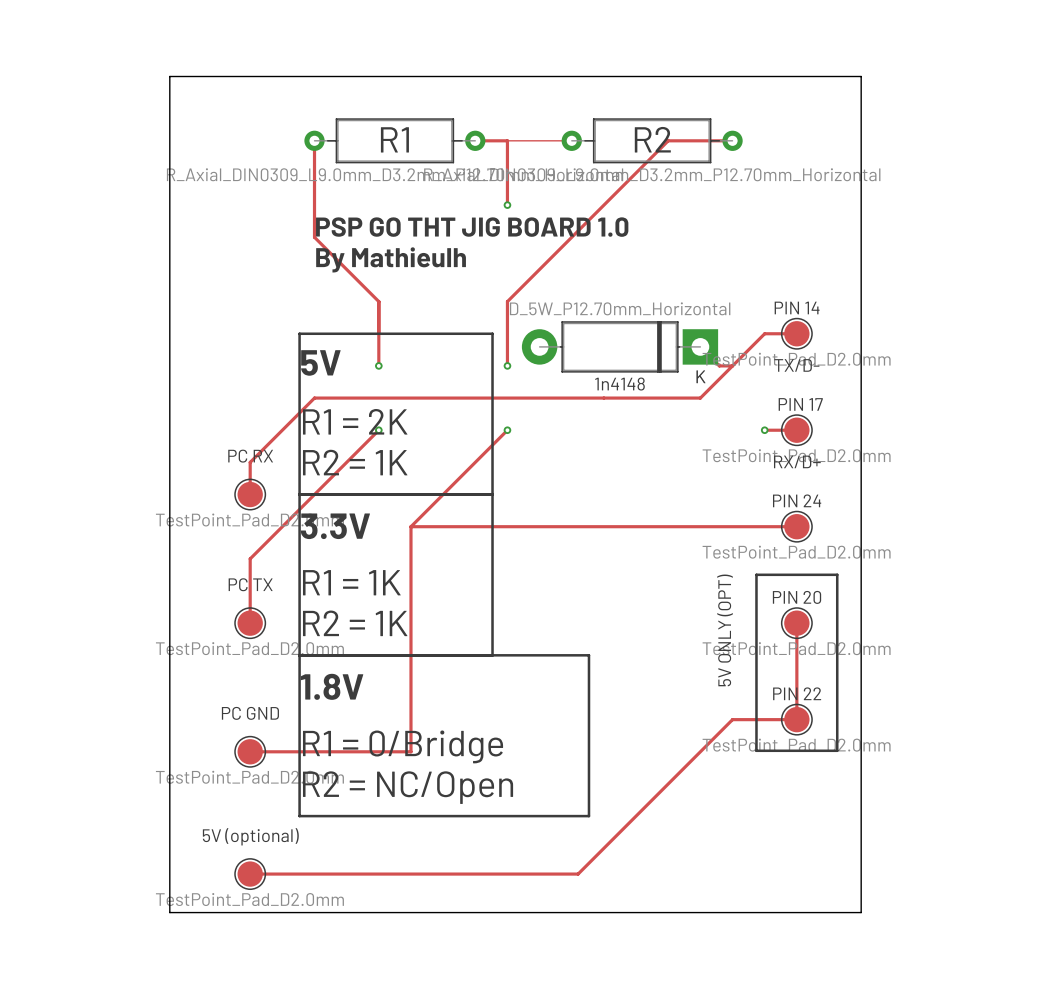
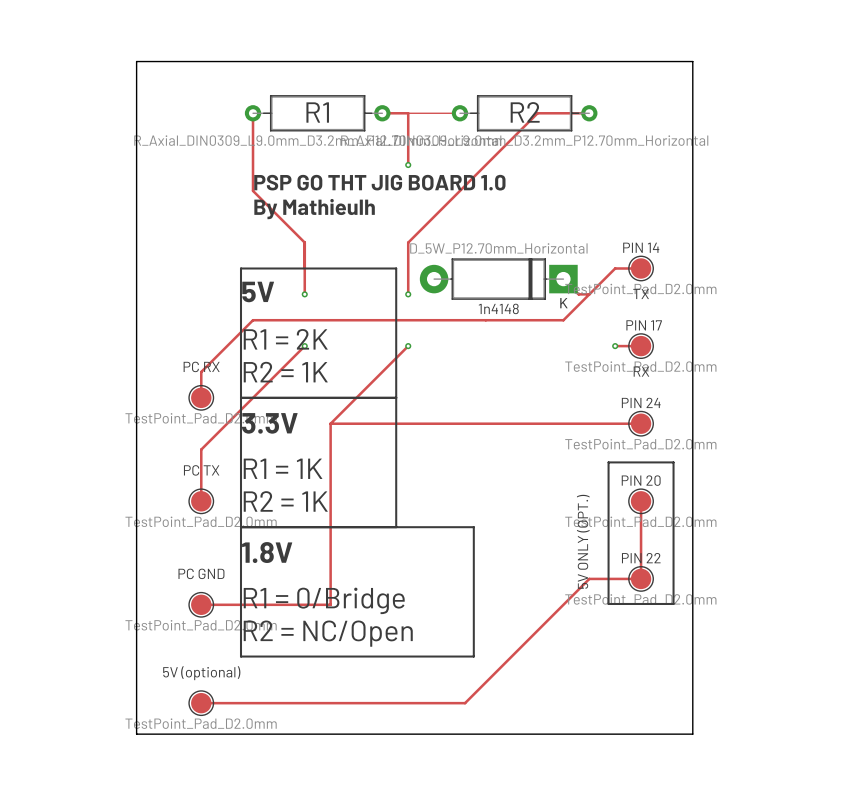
text: TX/D- (796, 365) -> TX (641, 293)
text: RX/D+ (797, 461) -> RX (641, 371)
text: 5V ONLY (OPT) (725, 630) -> 5V ONLY (OPT.) (583, 541)

